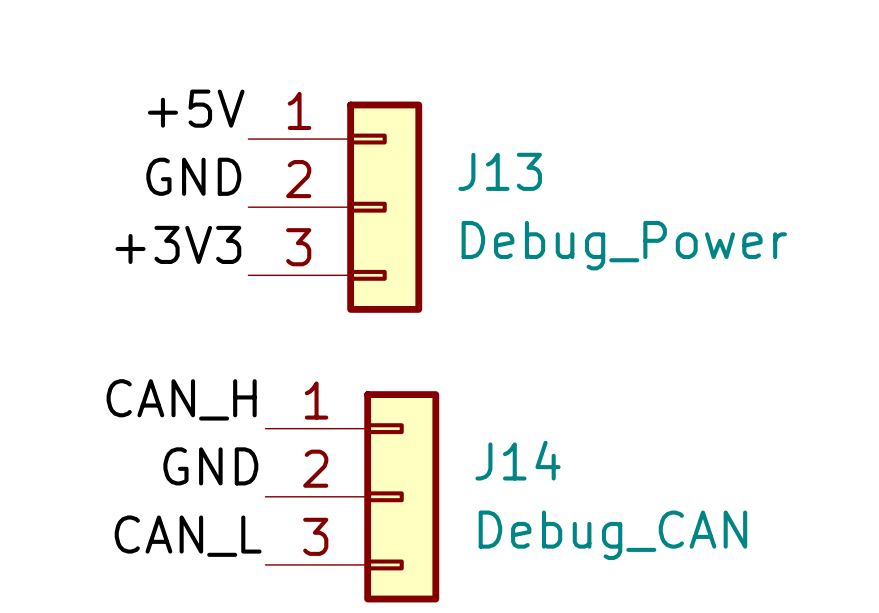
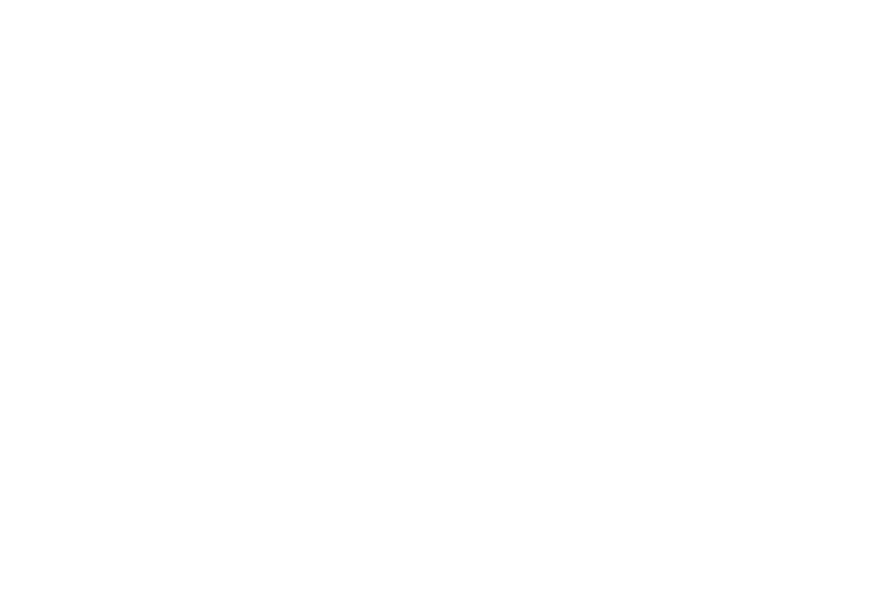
label: +5V (196, 108) -> none
label: GND (193, 176) -> none
J13: Debug_Power (335, 207) -> none
label: +3V3 (178, 244) -> none
label: CAN_H (181, 399) -> none
label: GND (210, 466) -> none
J14: Debug_CAN (352, 496) -> none
label: CAN_L (188, 536) -> none

